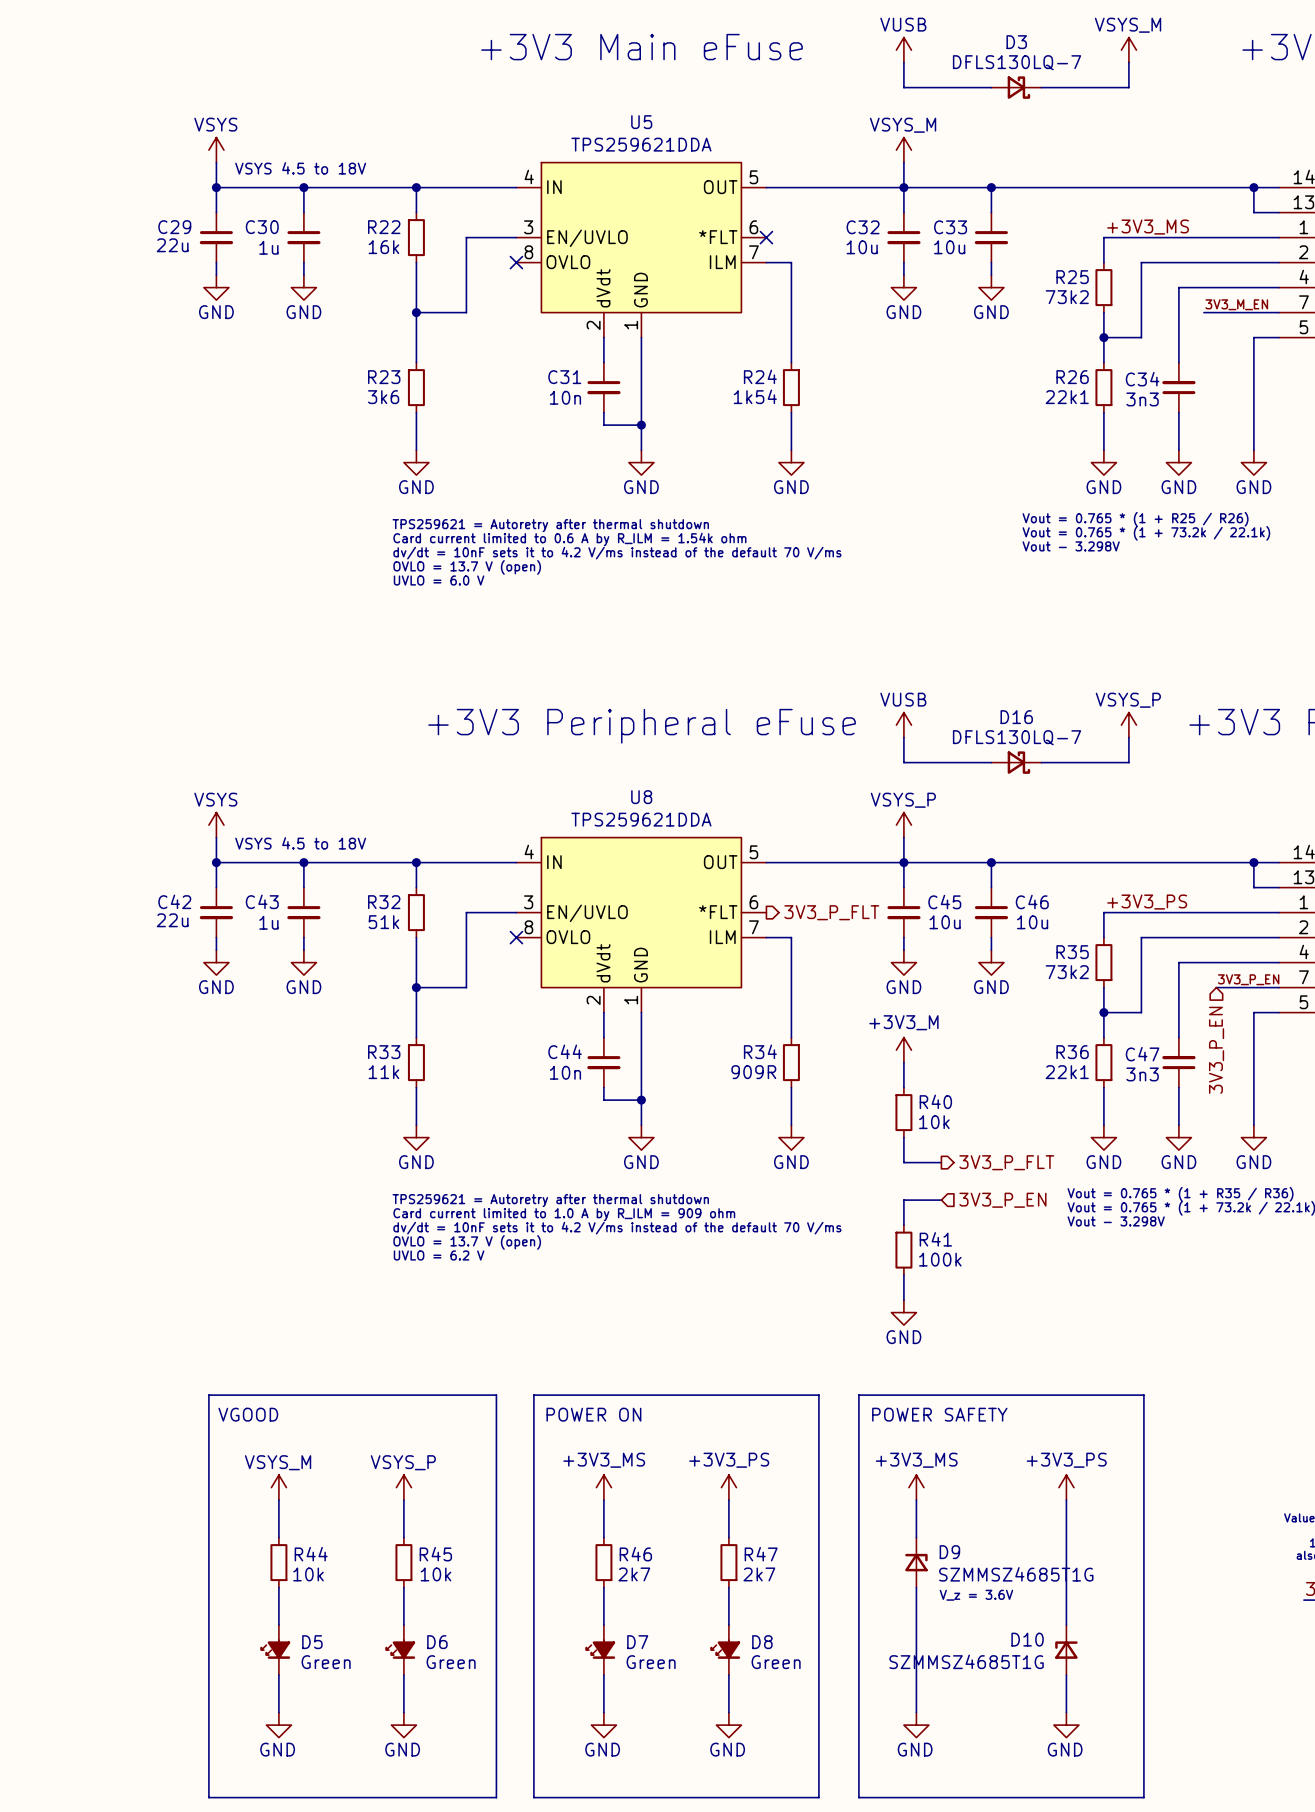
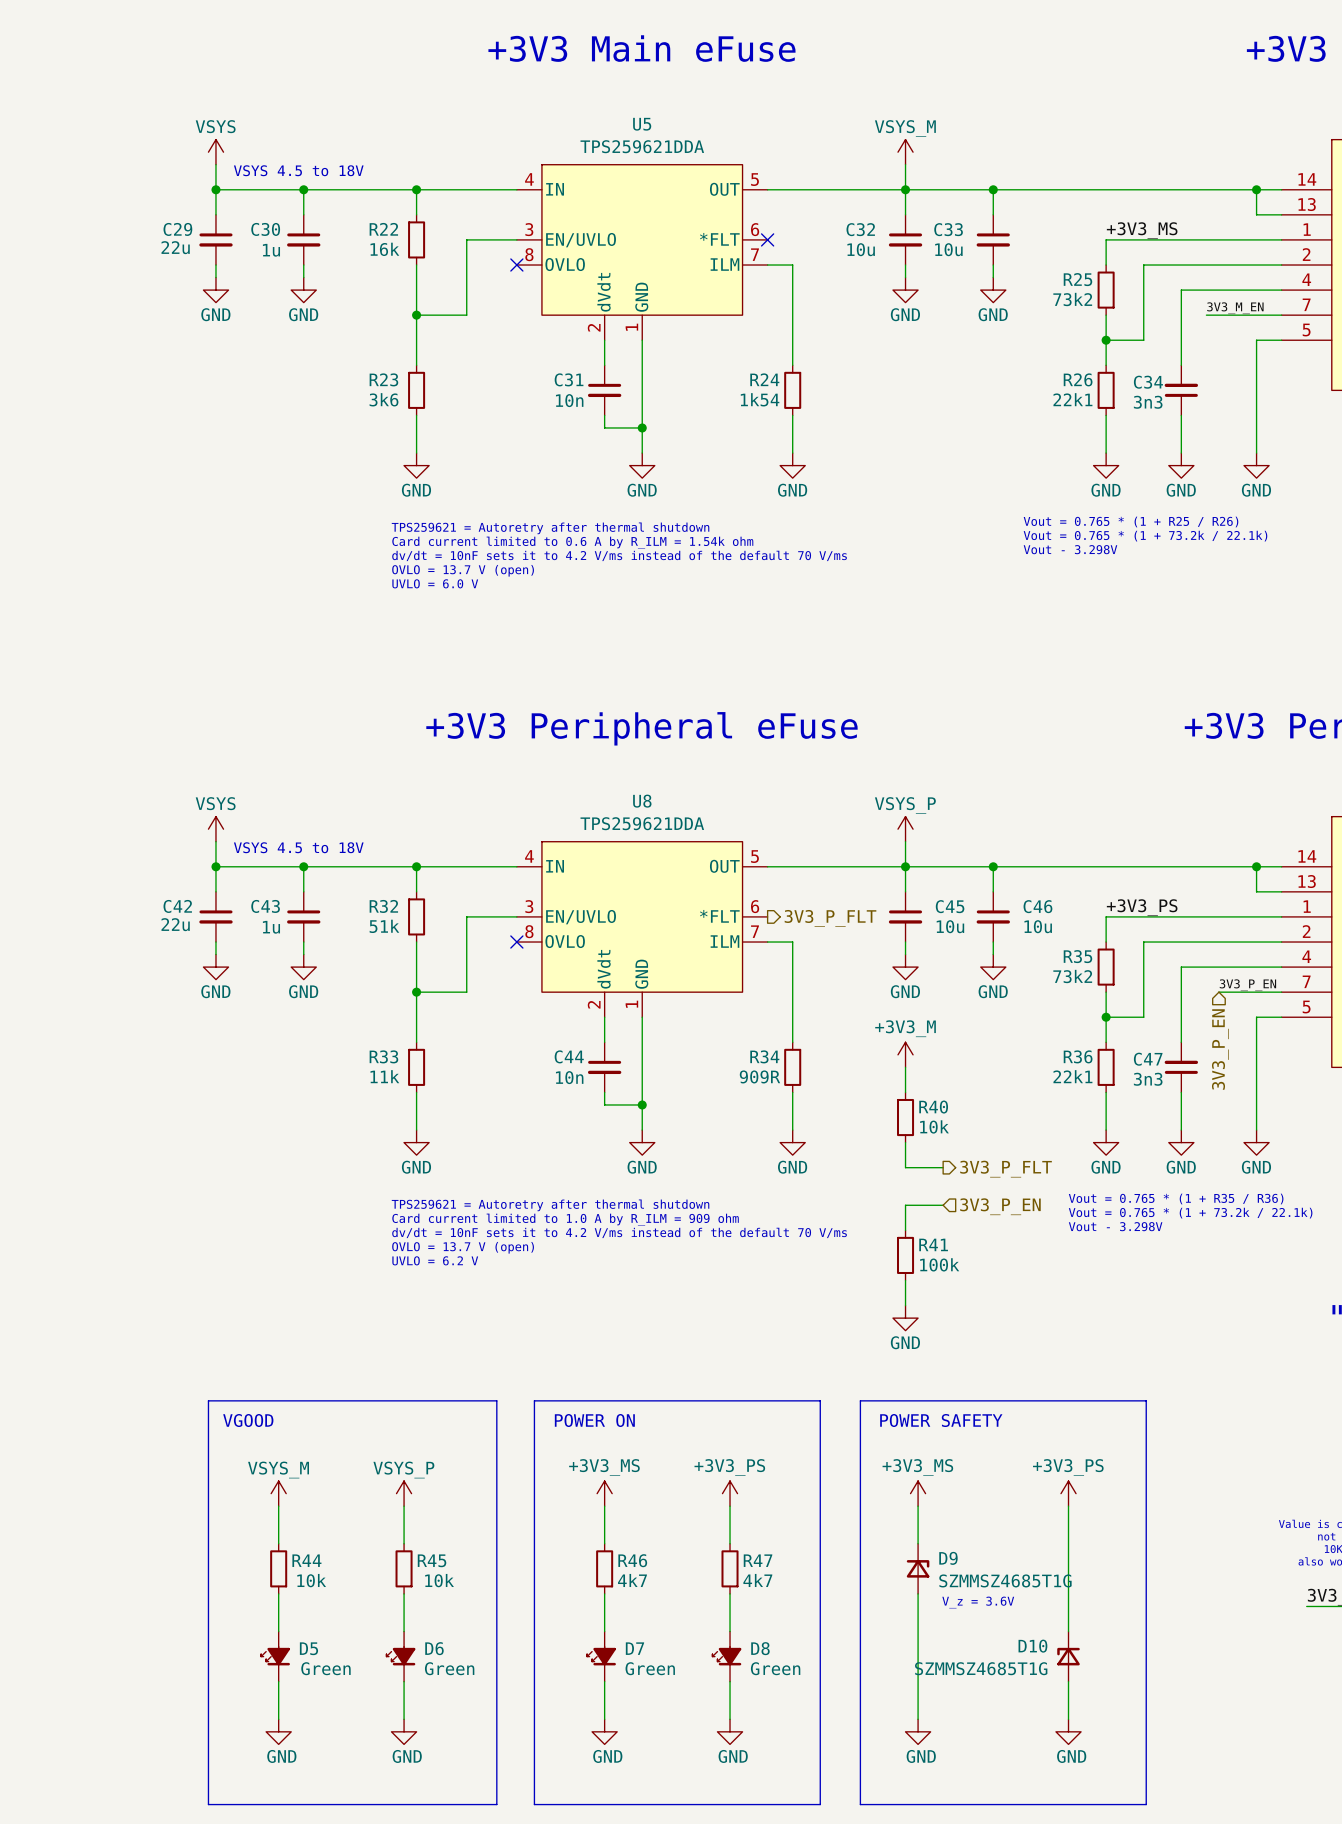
power symbol: VUSB (903, 50) -> none
power symbol: VSYS_M (1128, 50) -> none
wire: (903, 62) (903, 87) (991, 87) -> none
wire: (1128, 62) (1128, 87) (1041, 87) -> none
D3: DFLS130LQ-7 (1016, 87) -> none
power symbol: VUSB (903, 725) -> none
power symbol: VSYS_P (1128, 725) -> none
wire: (903, 737) (903, 762) (991, 762) -> none
wire: (1128, 737) (1128, 762) (1041, 762) -> none
D16: DFLS130LQ-7 (1016, 762) -> none
R46 value: 2k7 (634, 1574) -> 4k7 (632, 1580)
R47 value: 2k7 (759, 1574) -> 4k7 (757, 1580)

